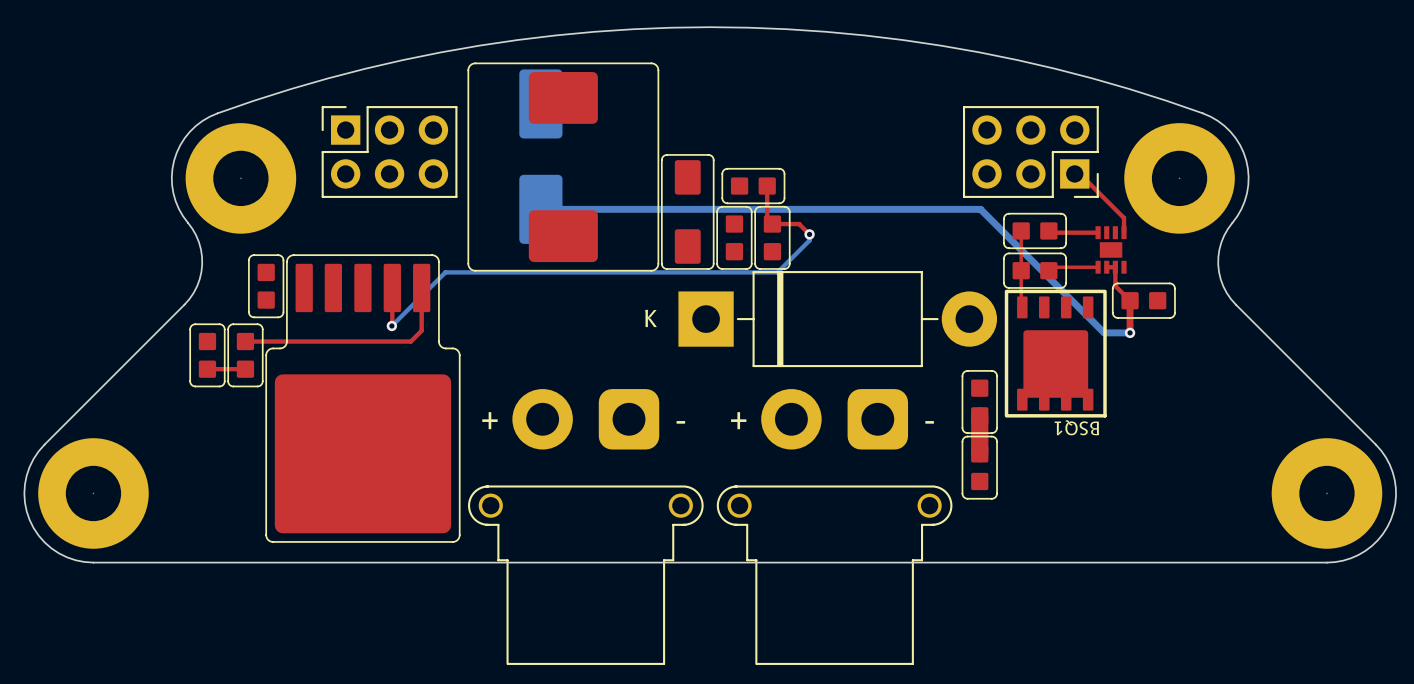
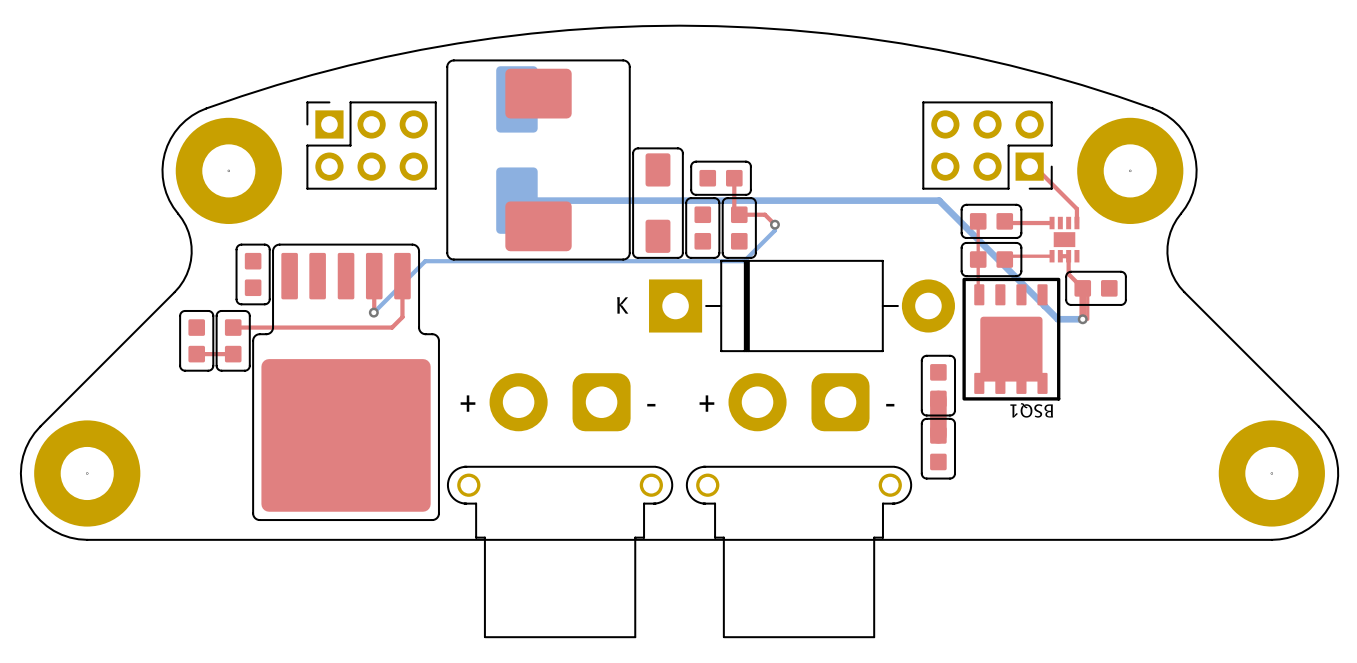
top track: none -> (1087, 286) (1087, 319)

